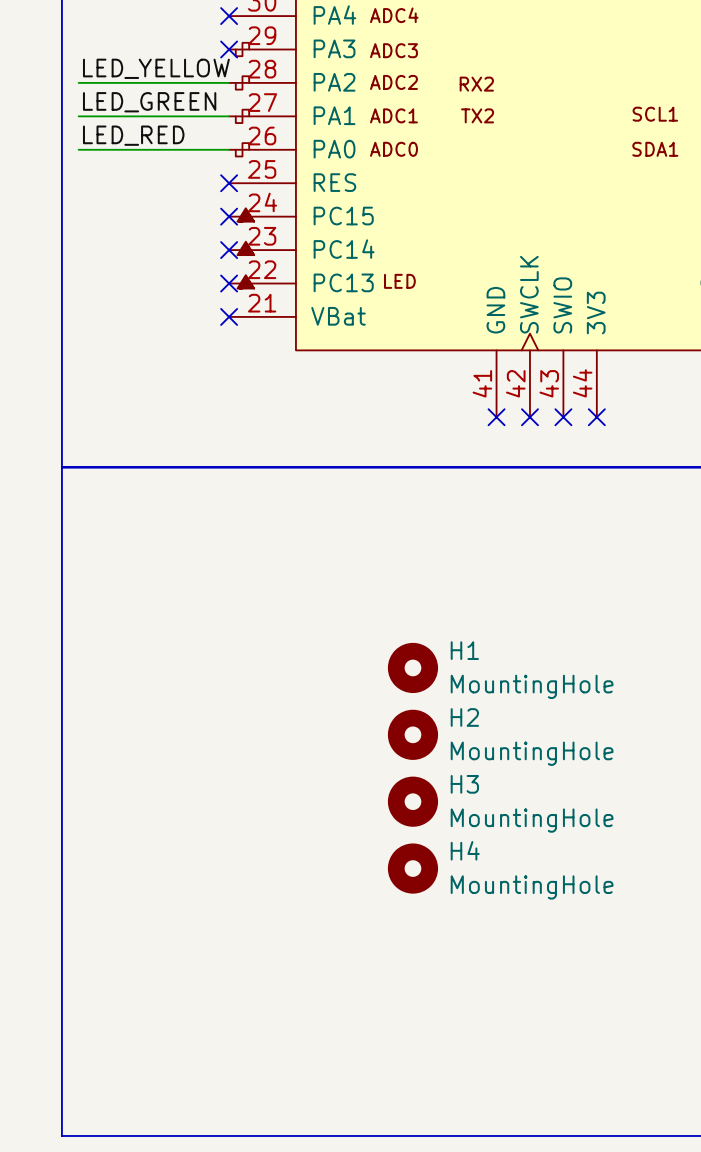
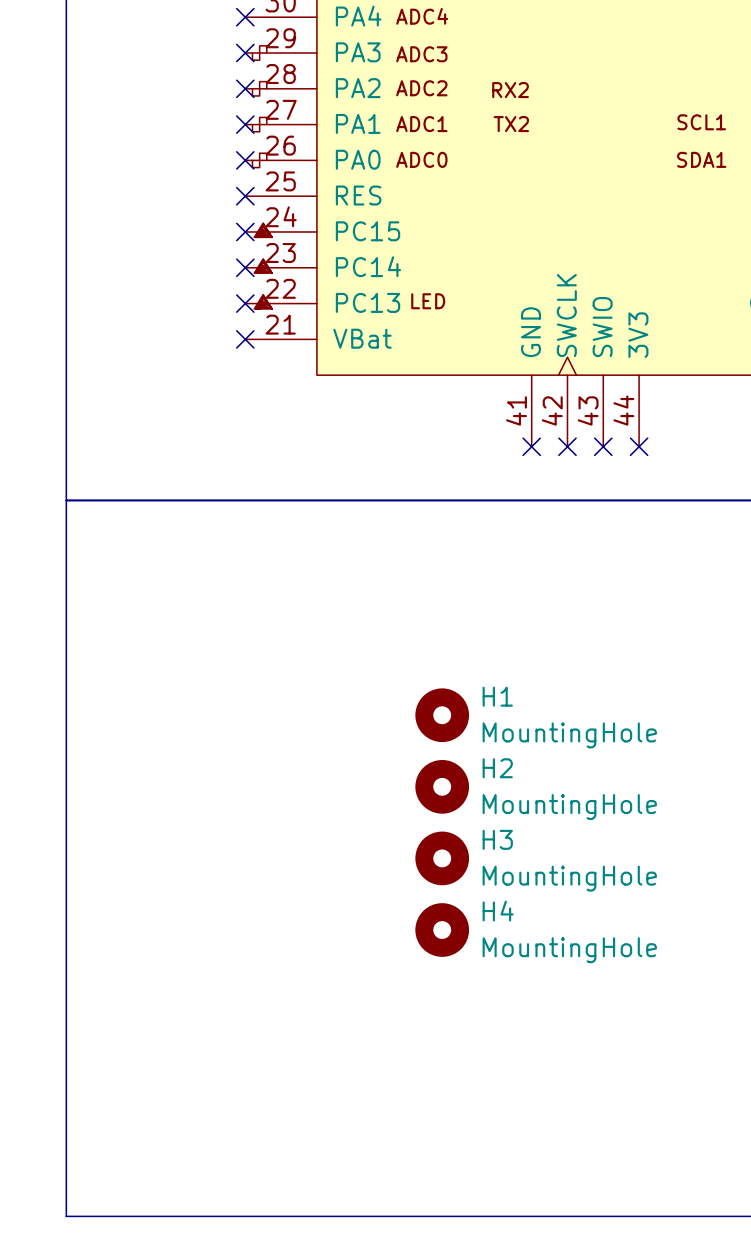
label: LED_YELLOW (156, 68) -> none
wire: (78, 82) (229, 82) -> none
no-connect mark: none -> (245, 88)
label: LED_GREEN (149, 102) -> none
wire: (78, 116) (229, 116) -> none
no-connect mark: none -> (245, 124)
label: LED_RED (133, 135) -> none
wire: (78, 149) (229, 149) -> none
no-connect mark: none -> (245, 160)

